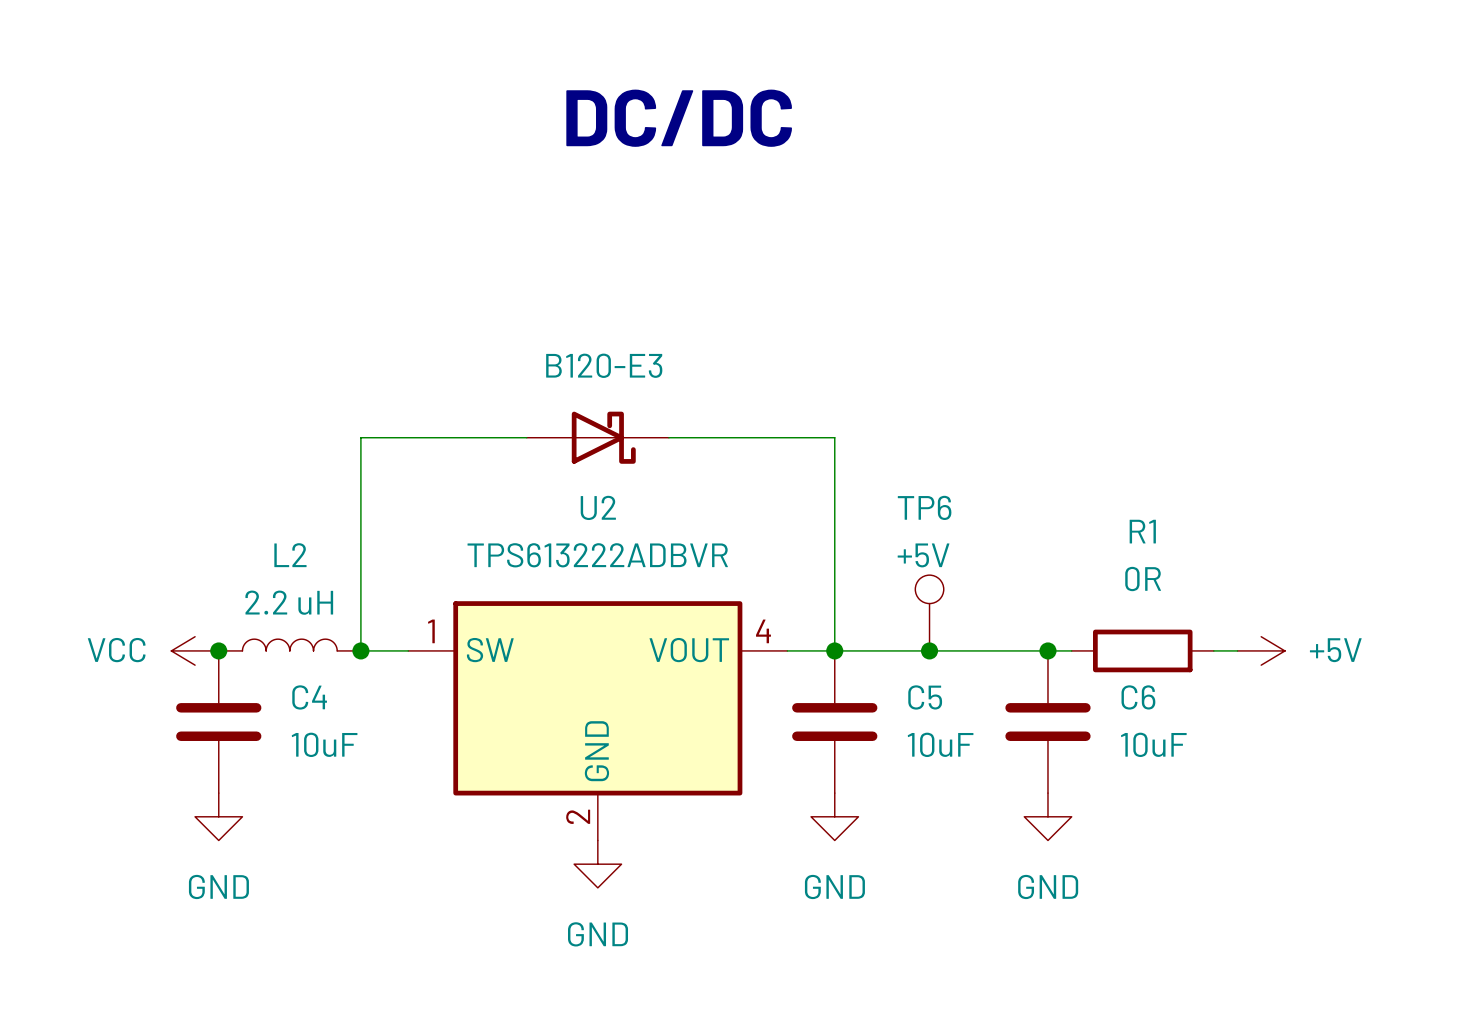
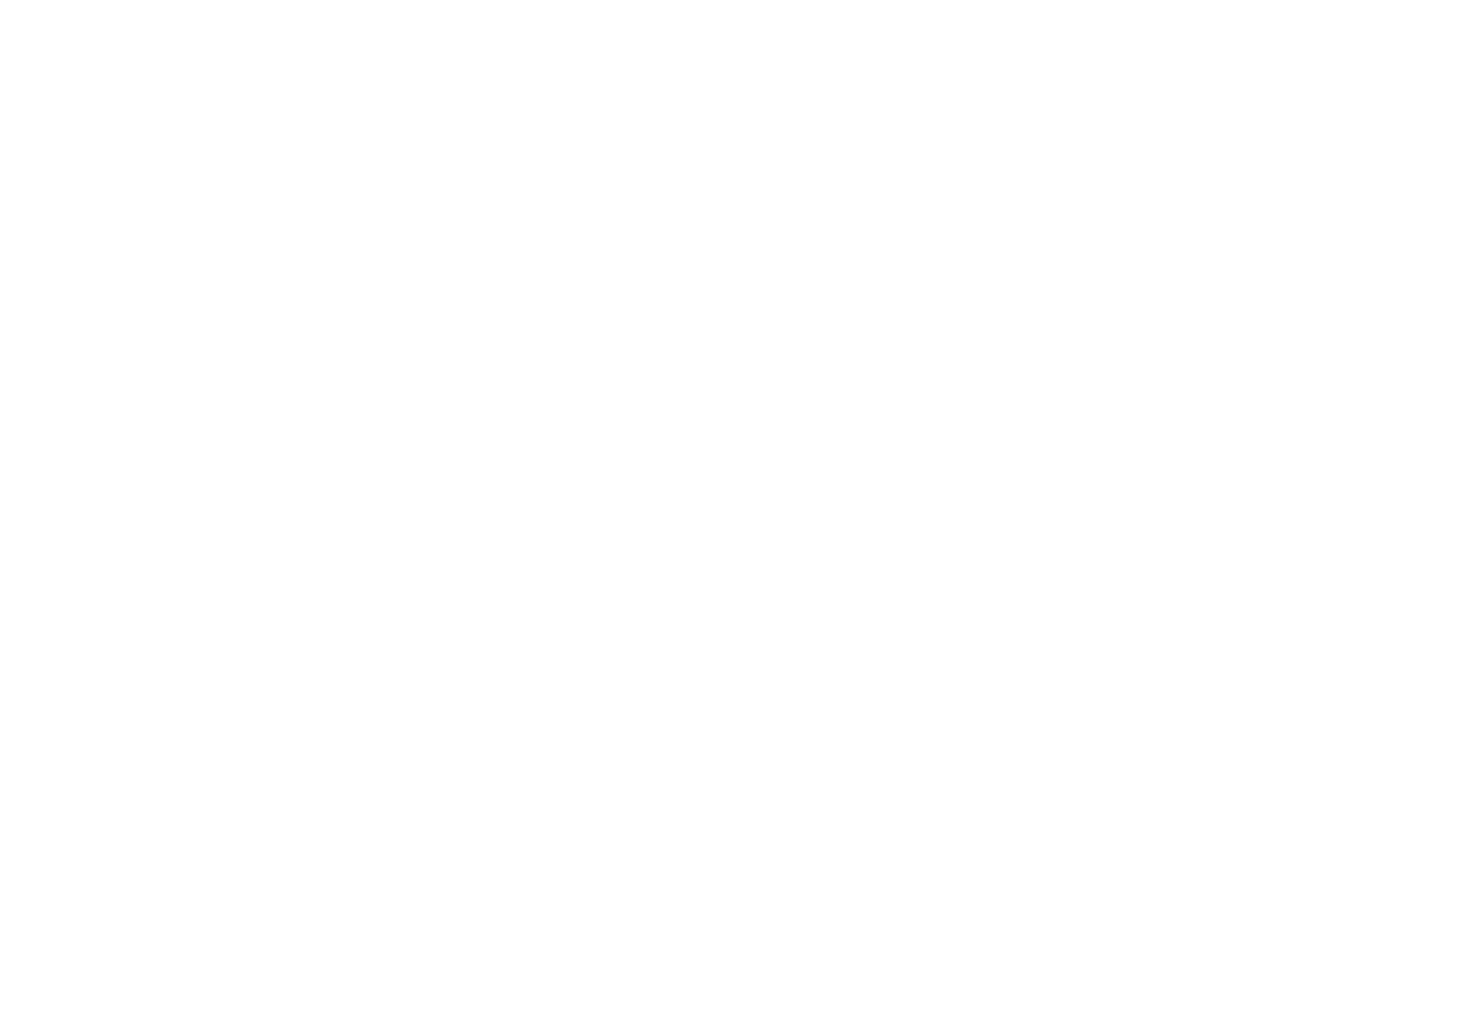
text: DC/DC (679, 118) -> none
wire: (526, 437) (360, 437) (360, 650) (408, 650) -> none
part: B120-E3 (597, 437) -> none
wire: (668, 437) (834, 437) (834, 650) -> none
TP6: +5V (929, 613) -> none
L2: 2.2 uH (289, 645) -> none
power symbol: VCC (195, 650) -> none
junction: (218, 650) -> none
junction: (360, 650) -> none
wire: (787, 650) (1071, 650) -> none
junction: (834, 650) -> none
junction: (929, 650) -> none
junction: (1047, 650) -> none
R1: 0R (1142, 650) -> none
wire: (1213, 650) (1237, 650) -> none
power symbol: +5V (1261, 650) -> none
U2: TPS613222ADBVR (597, 720) -> none
C4: 10uF (218, 722) -> none
C5: 10uF (834, 722) -> none
C6: 10uF (1047, 722) -> none
power symbol: GND (218, 816) -> none
power symbol: GND (834, 816) -> none
power symbol: GND (1047, 816) -> none
power symbol: GND (597, 864) -> none

